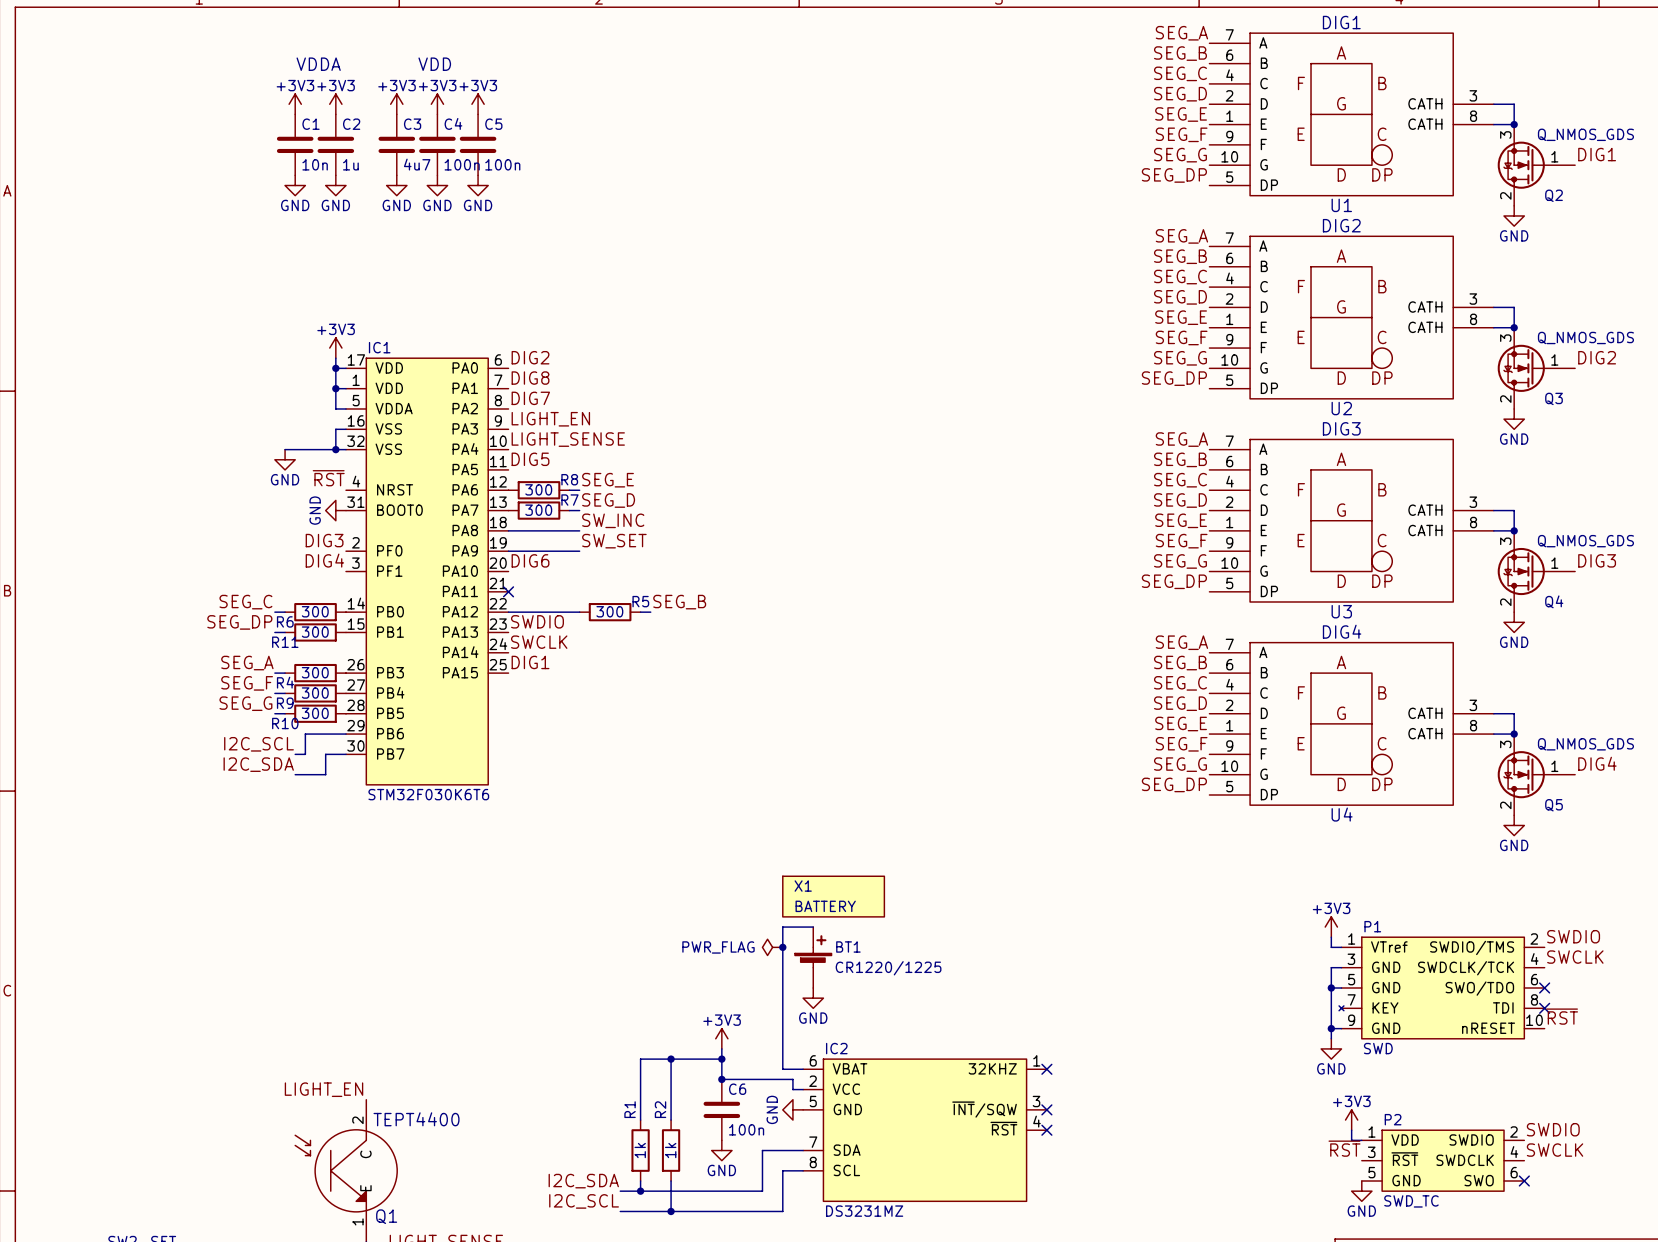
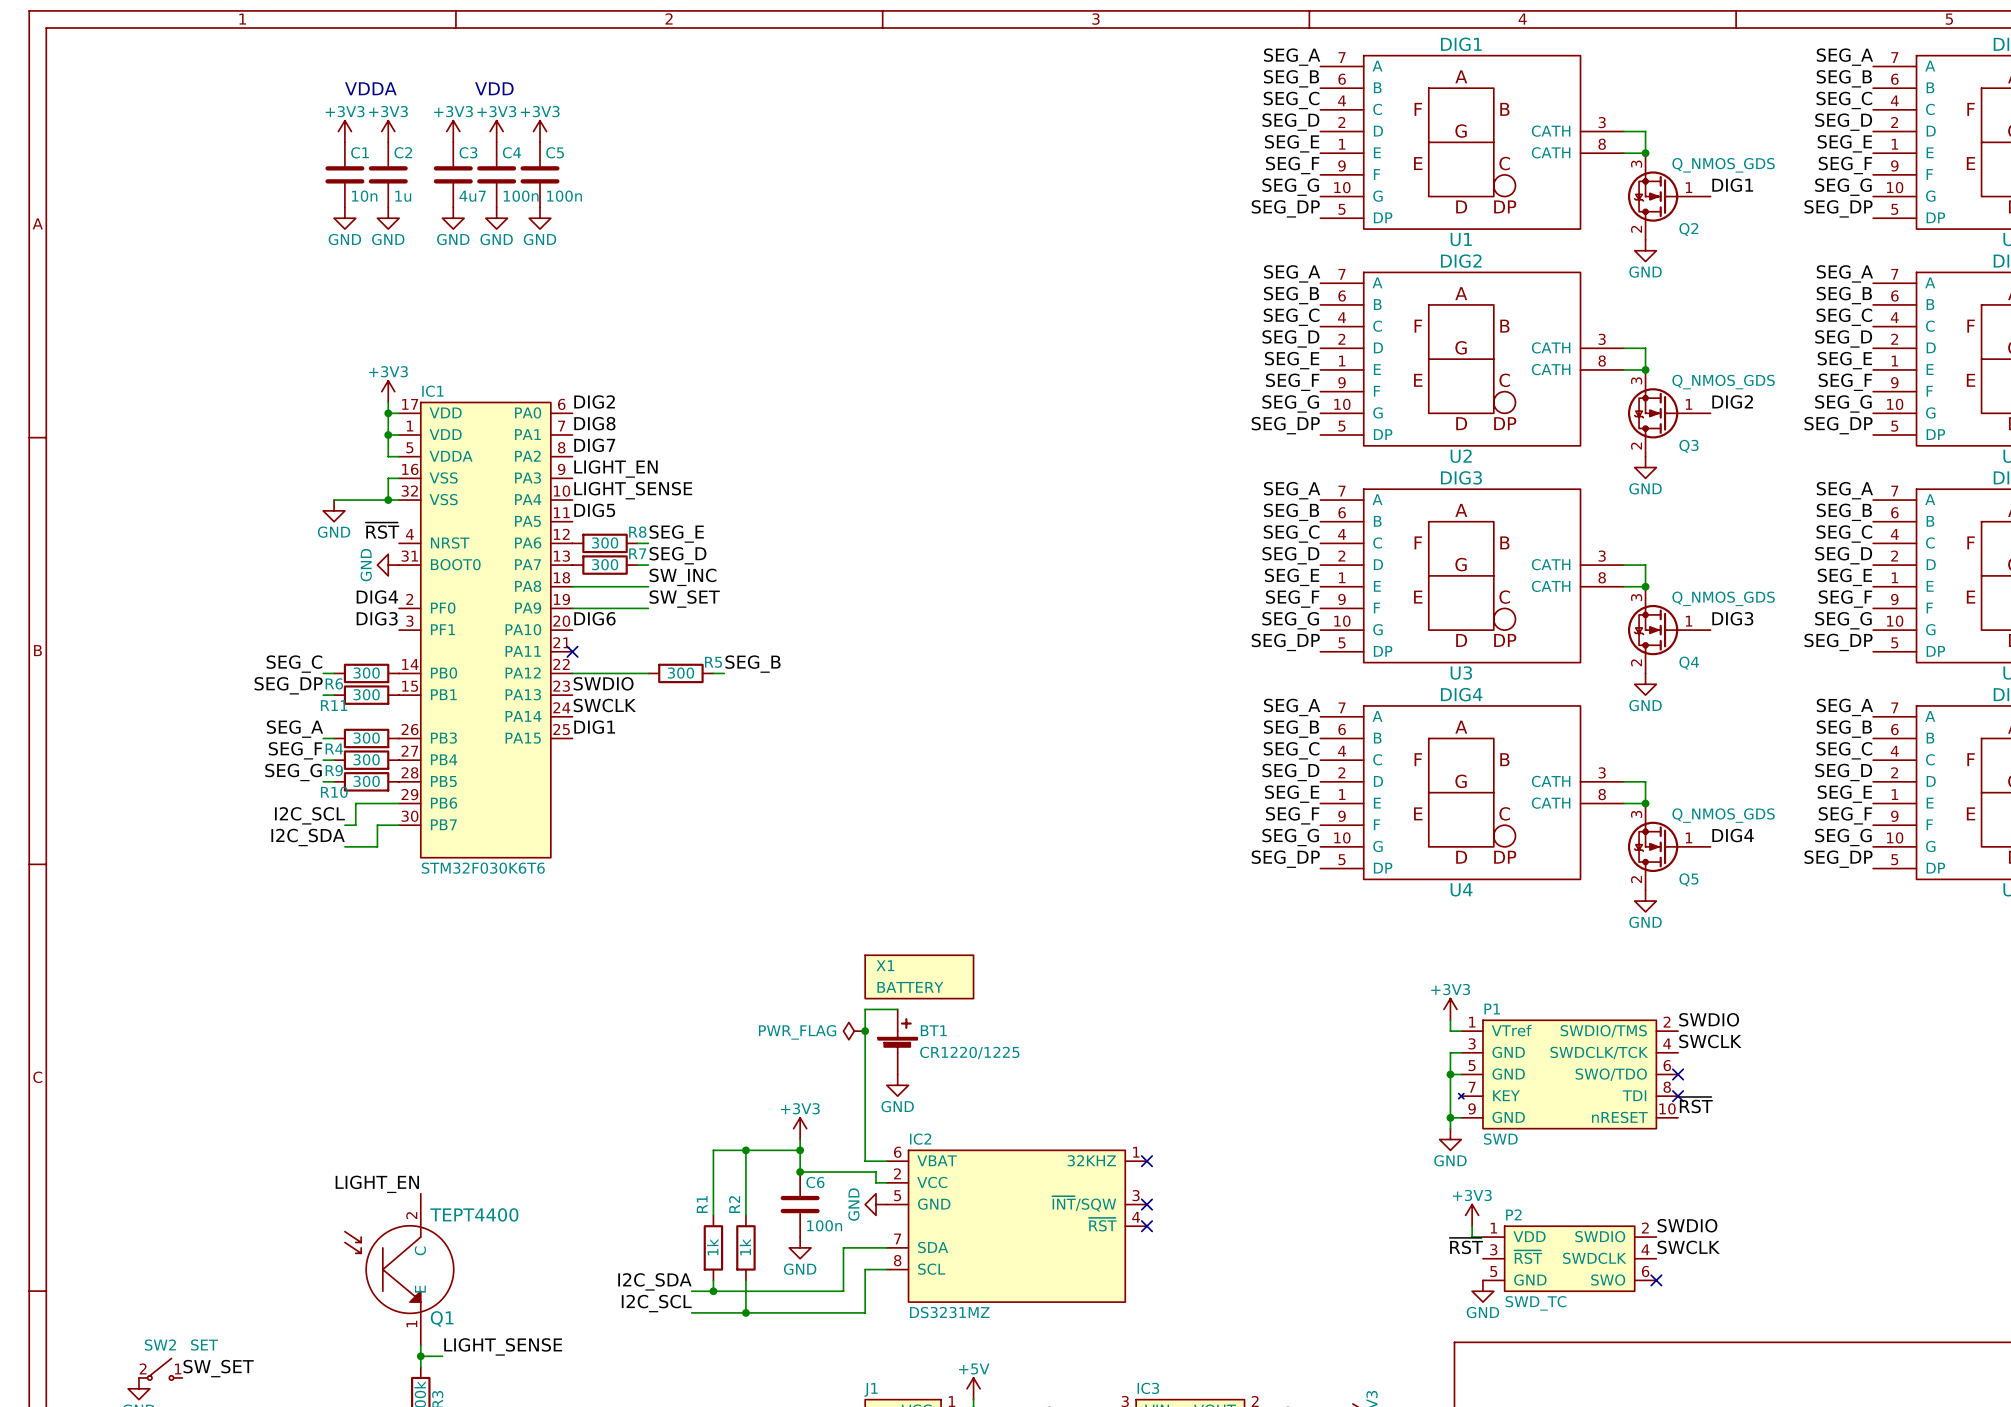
label: DIG3 (324, 540) -> DIG4 (377, 597)
label: DIG4 (324, 560) -> DIG3 (377, 618)

